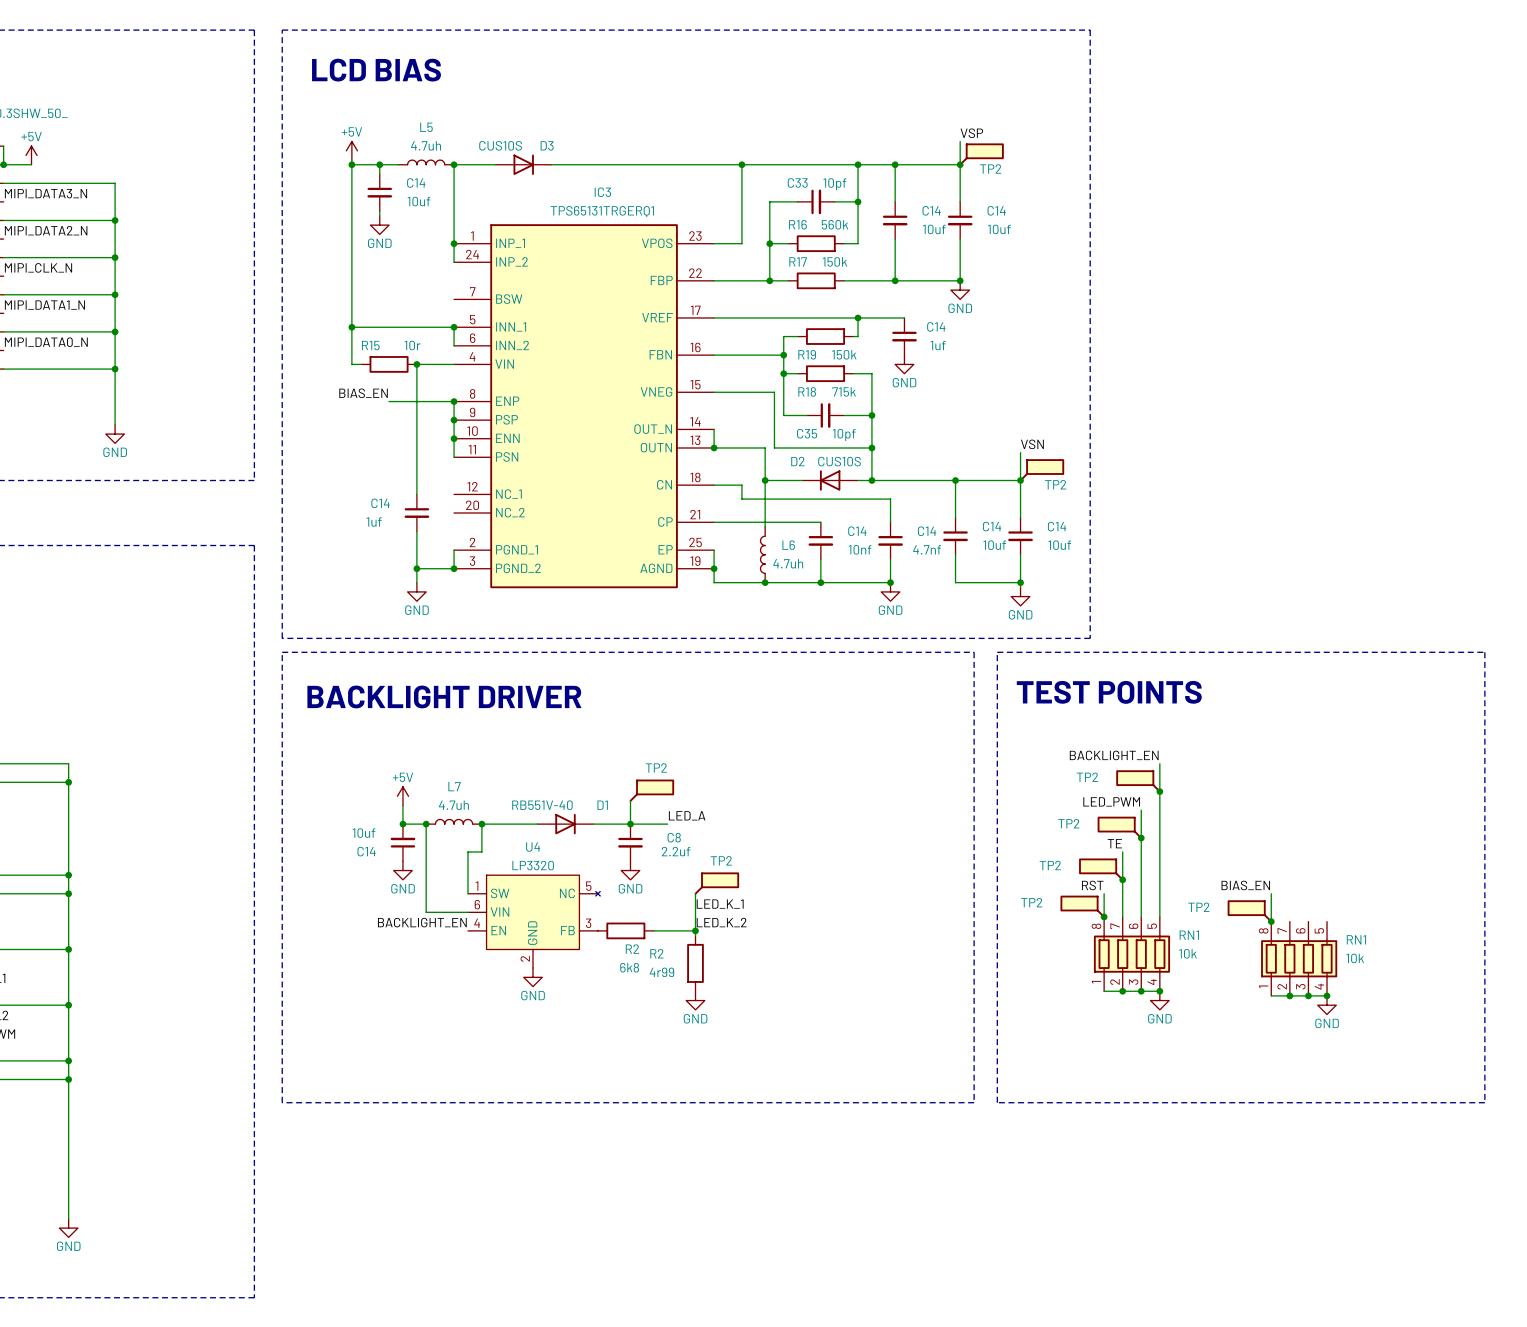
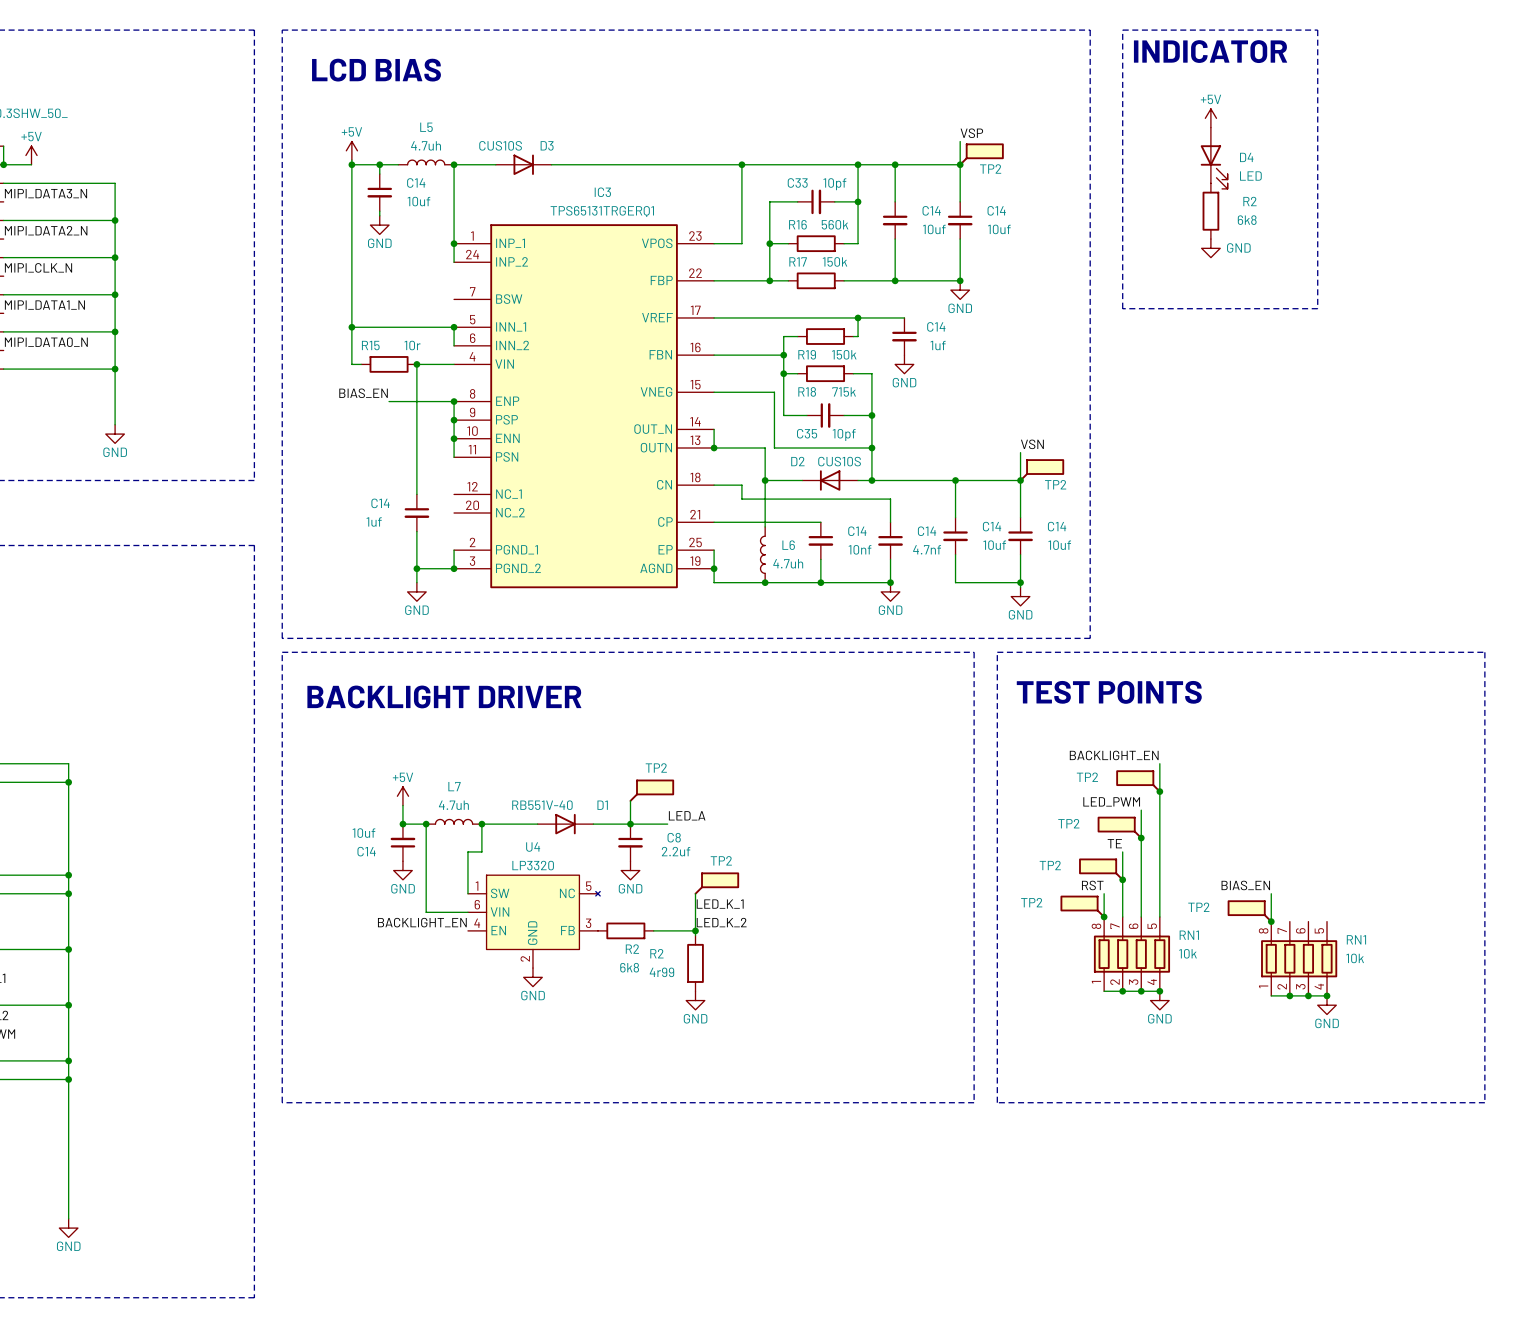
line: none -> (1122, 30) (1317, 30) (1317, 308) (1122, 308) (1122, 30)
text: none -> INDICATOR (1210, 51)
power symbol: none -> +5V (1210, 118)
D4: none -> LED (1214, 158)
R2: none -> 6k8 (1210, 211)
power symbol: none -> GND (1210, 248)

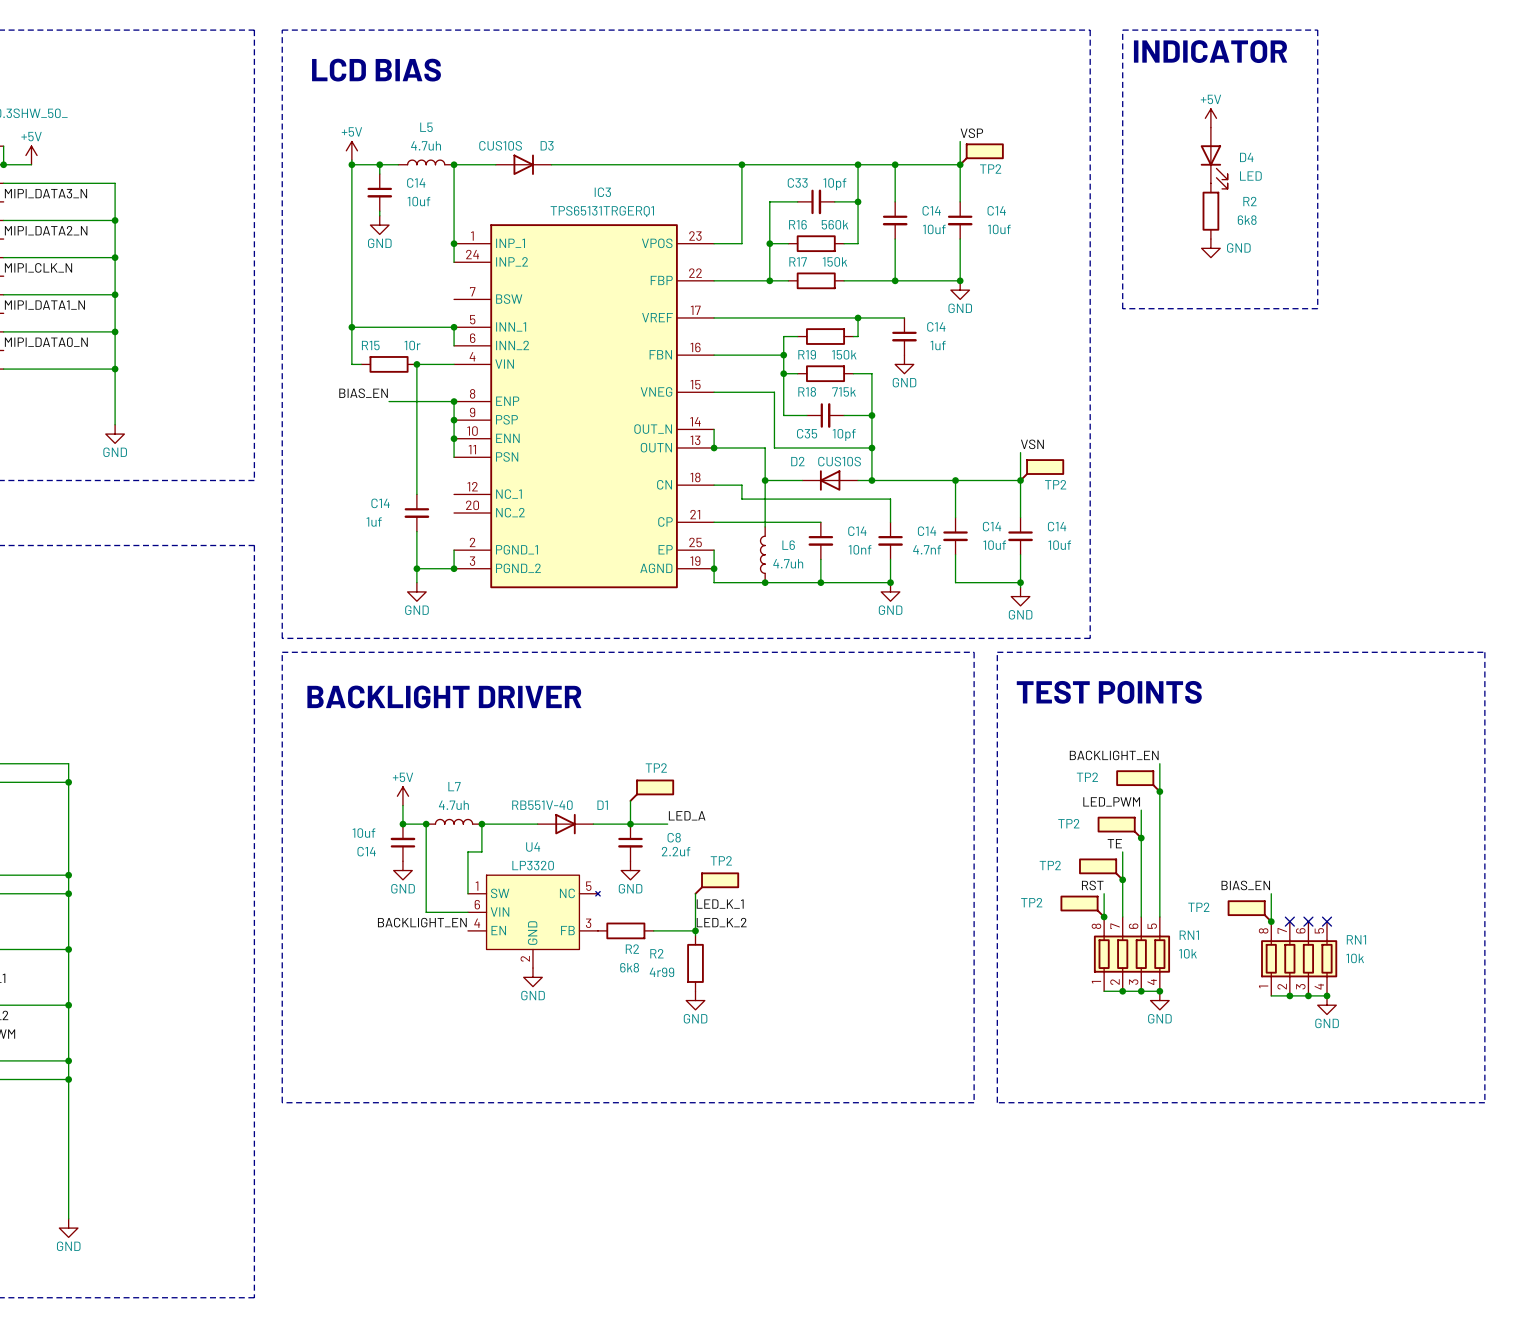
no-connect mark: none -> (1289, 921)
no-connect mark: none -> (1308, 921)
no-connect mark: none -> (1327, 921)

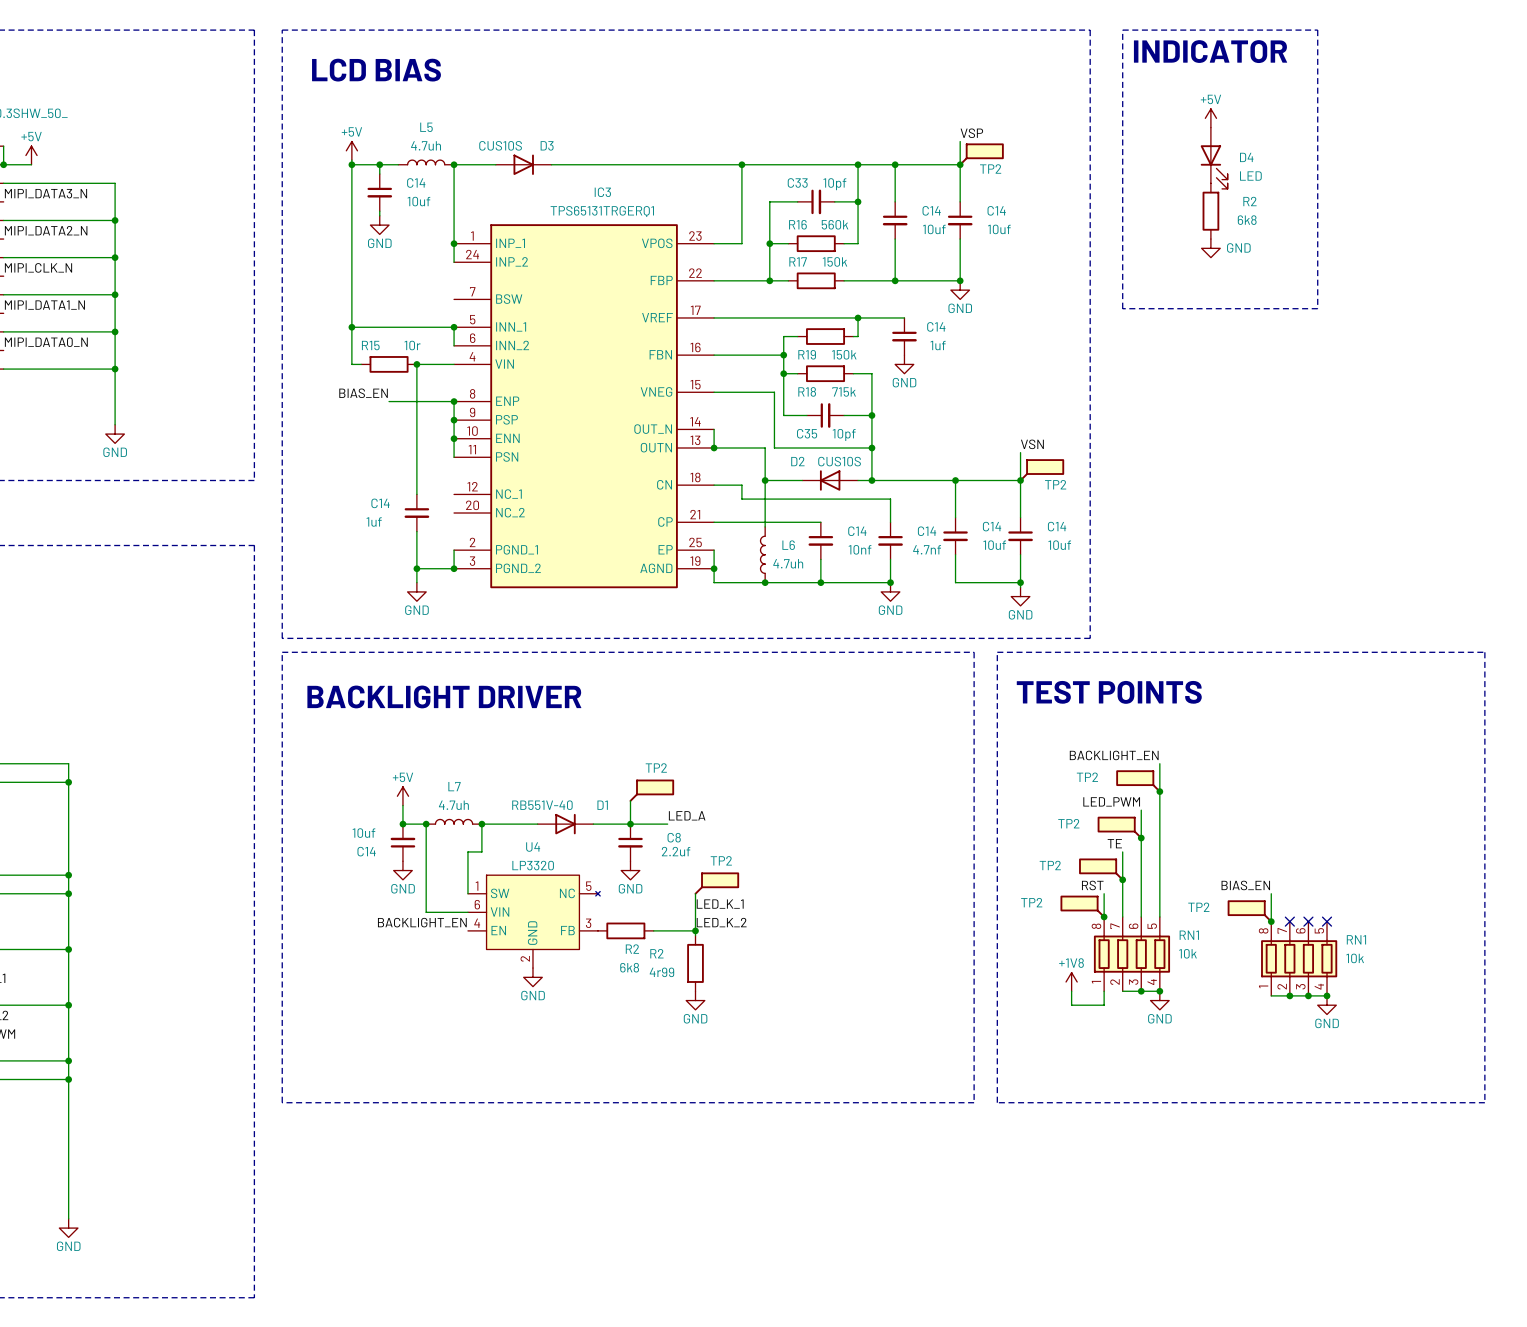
power symbol: none -> +1V8 (1071, 981)
wire: (1104, 991) (1122, 991) -> (1104, 991) (1104, 1005) (1071, 1005) (1071, 991)
junction: (1122, 991) -> none

